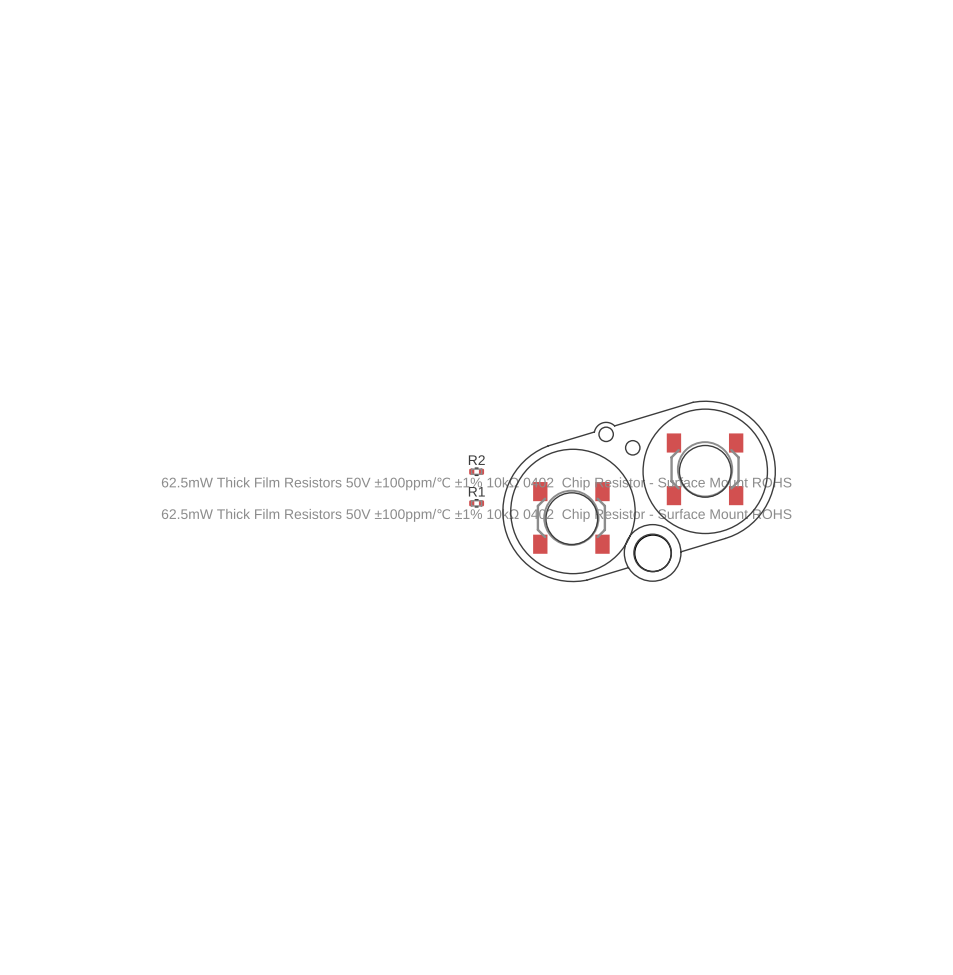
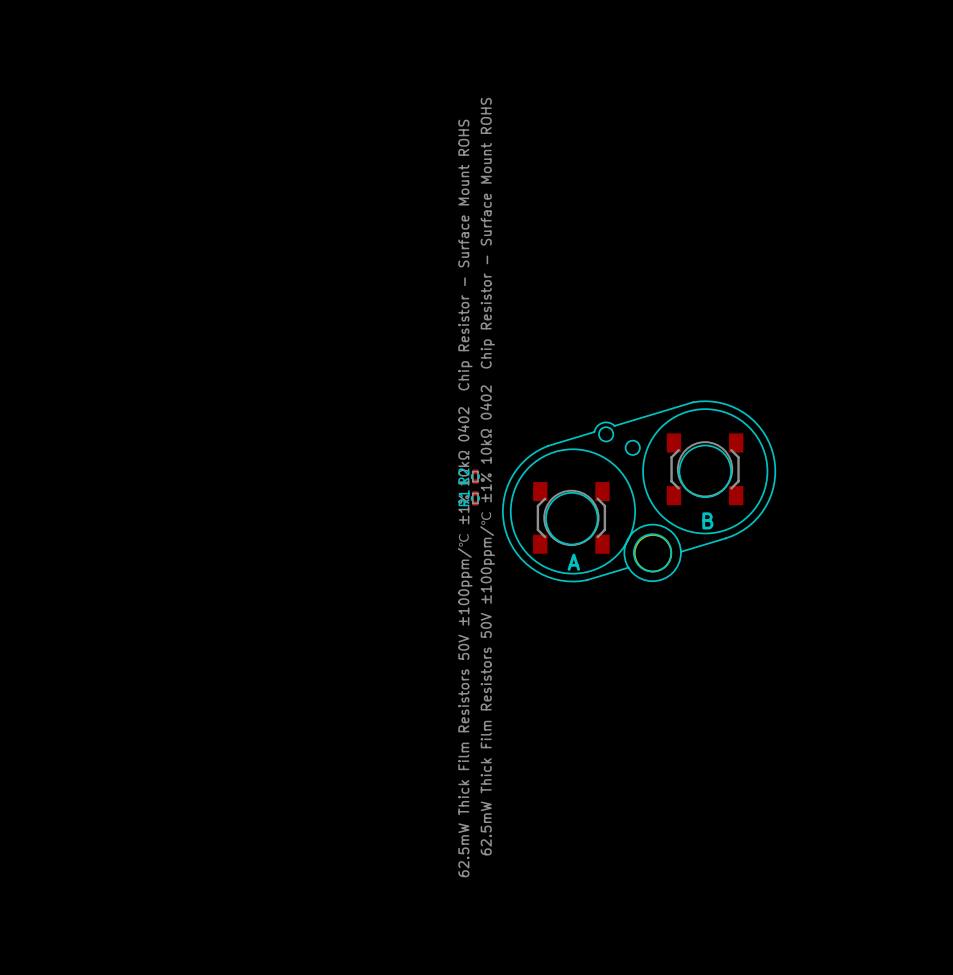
R2 rotation: 0° (476, 471) -> 90° clockwise (475, 476)
R1 rotation: 0° (476, 503) -> 90° clockwise (475, 498)
text: none -> B (707, 520)
text: none -> A (573, 562)

